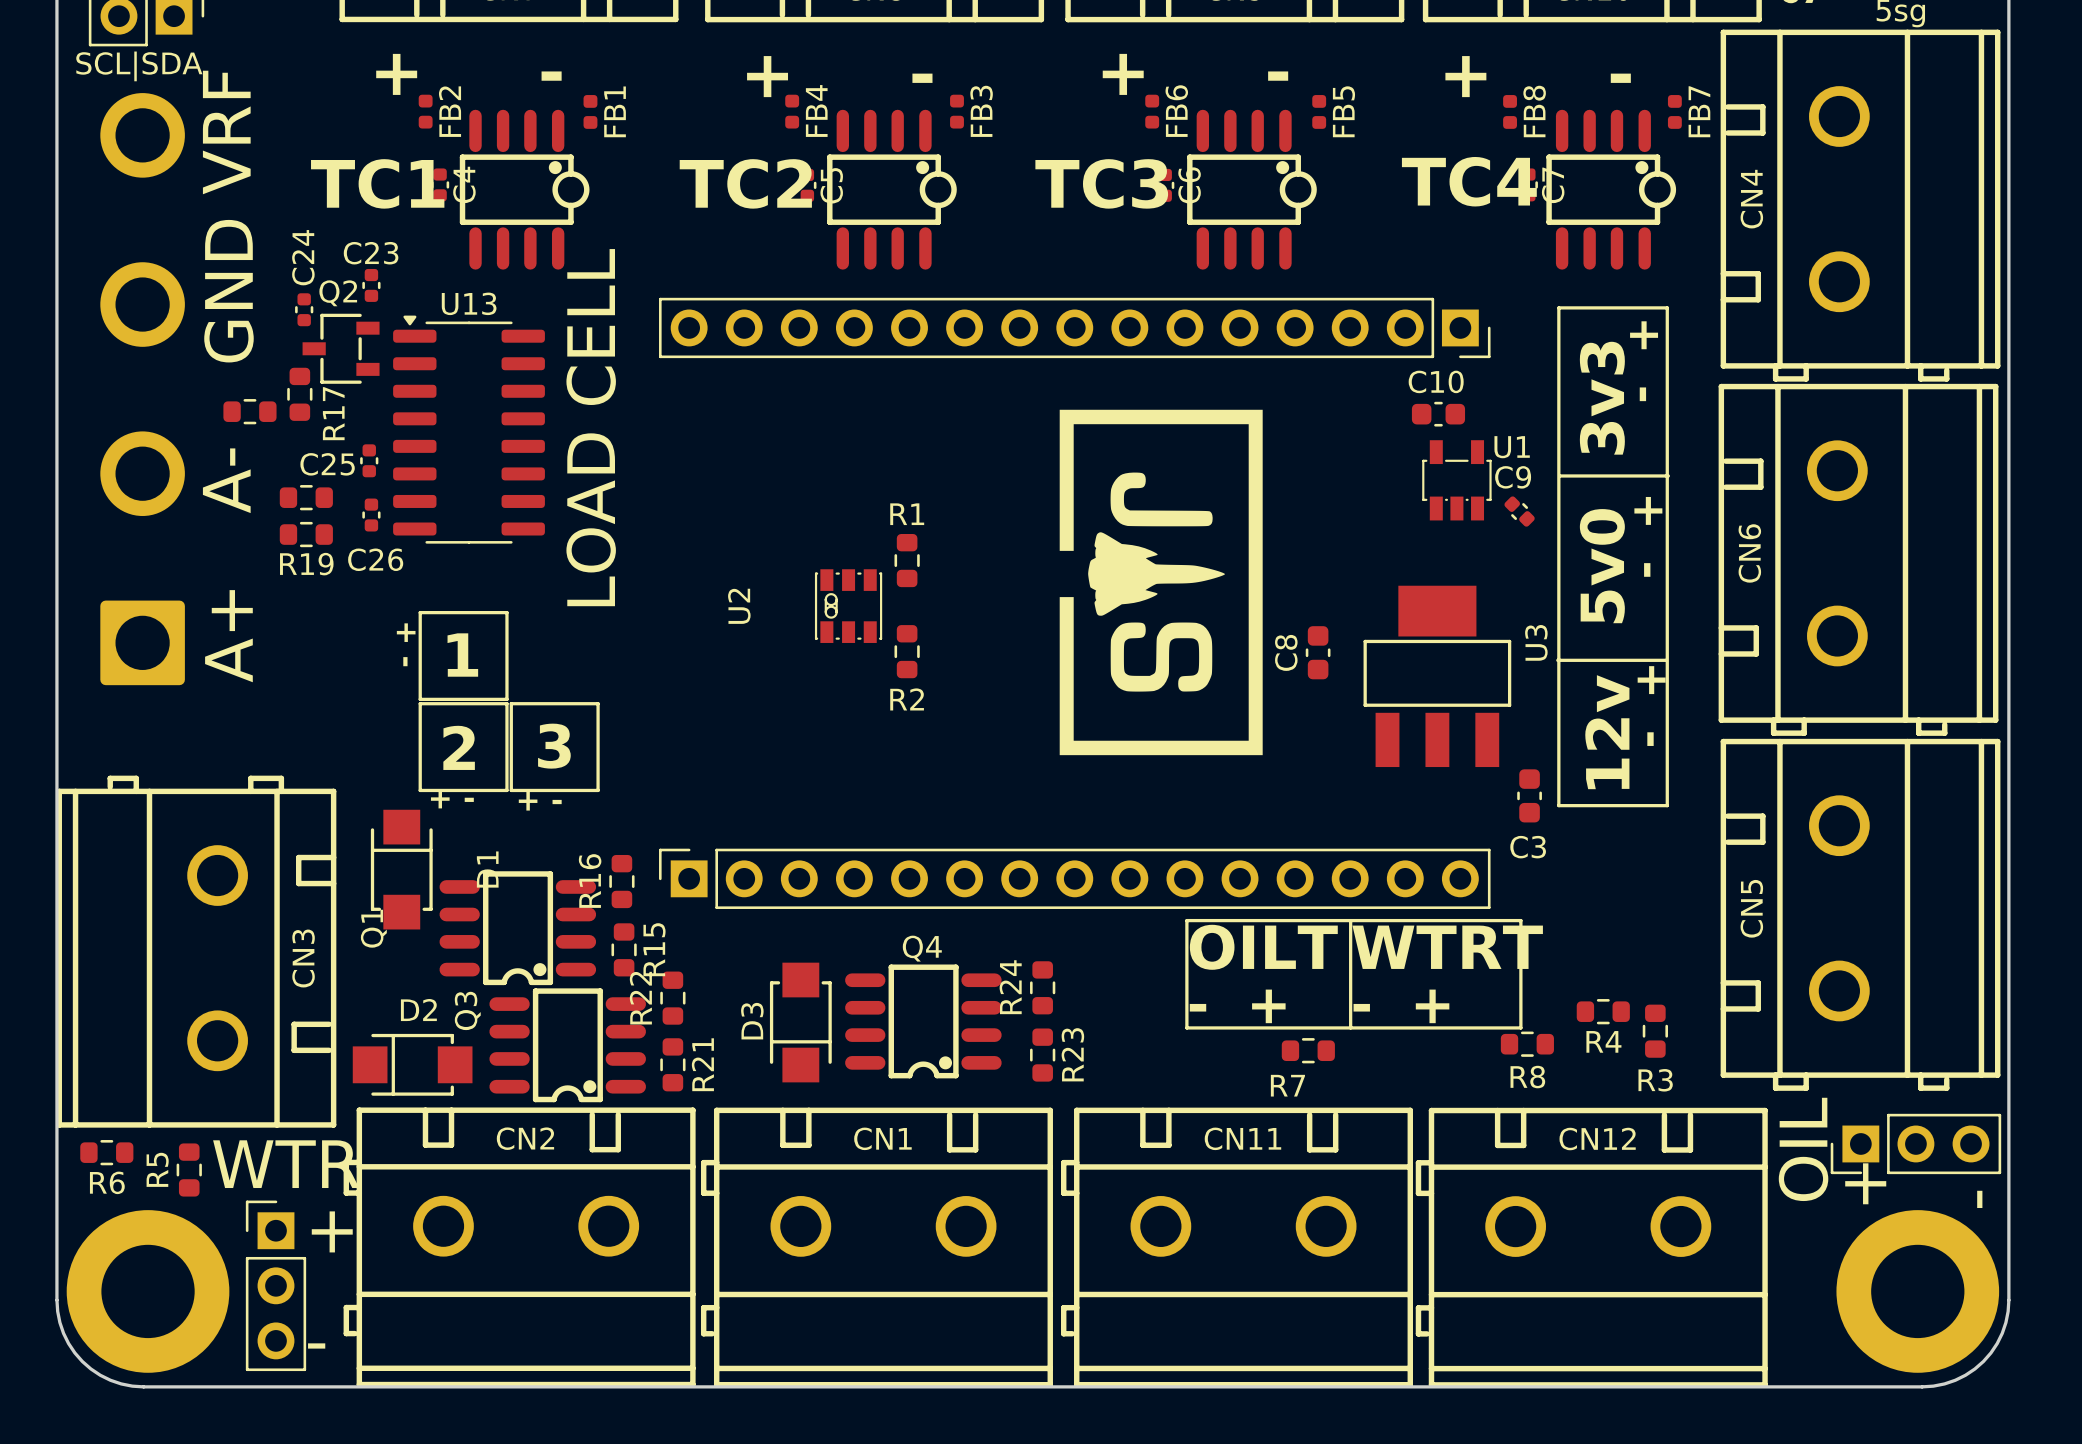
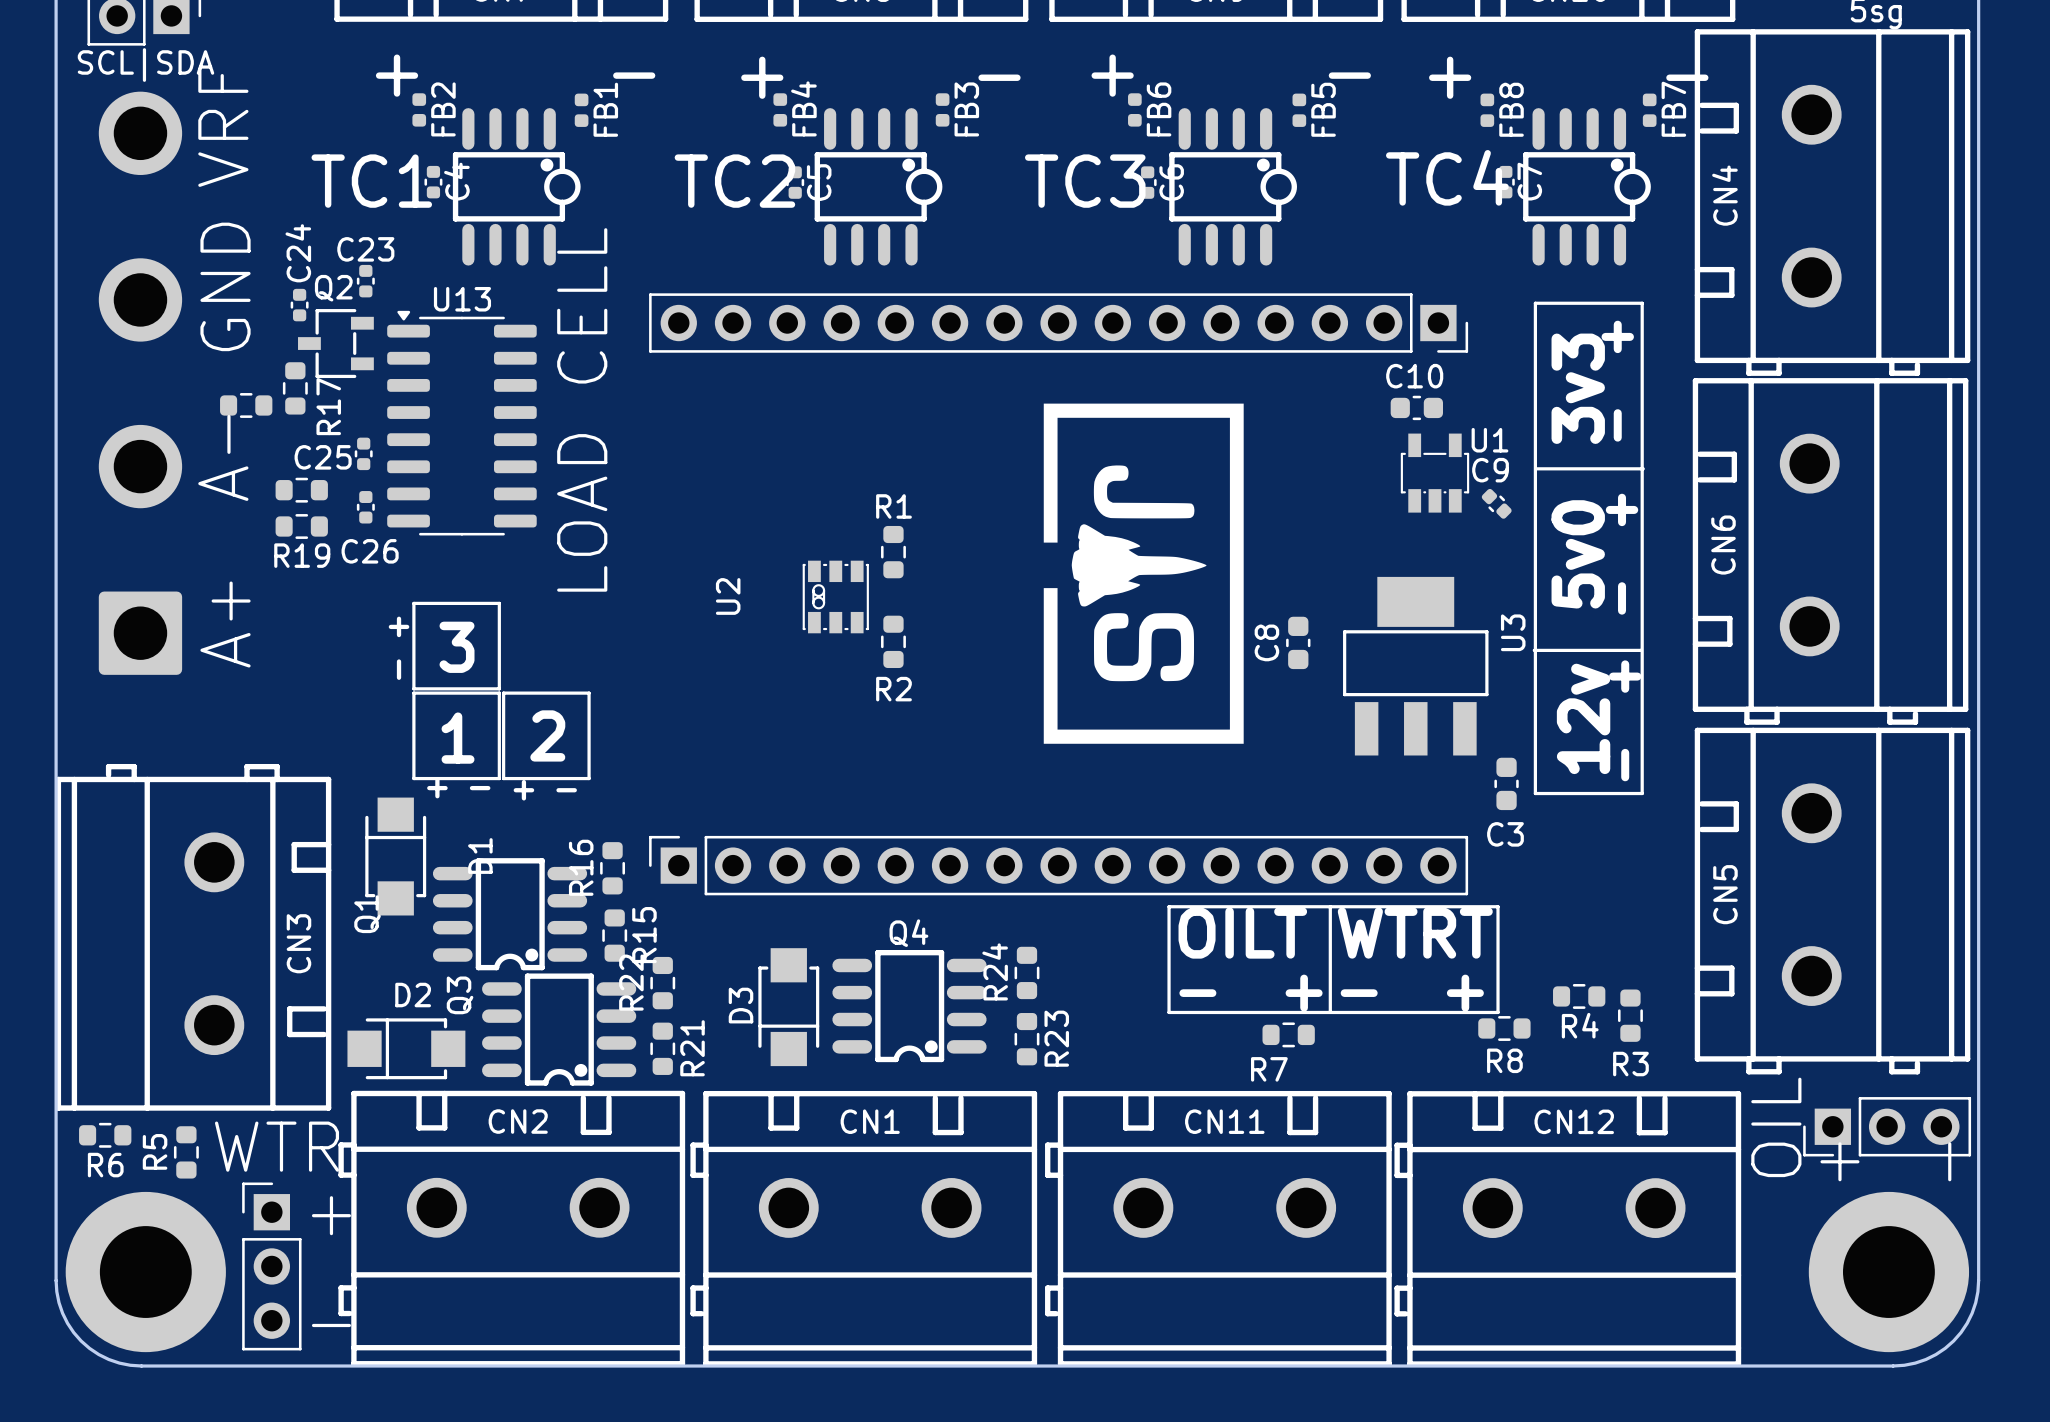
text: 1 (462, 655) -> 3 (457, 647)
text: 3 (554, 746) -> 2 (547, 735)
text: 2 (459, 747) -> 1 (458, 738)

